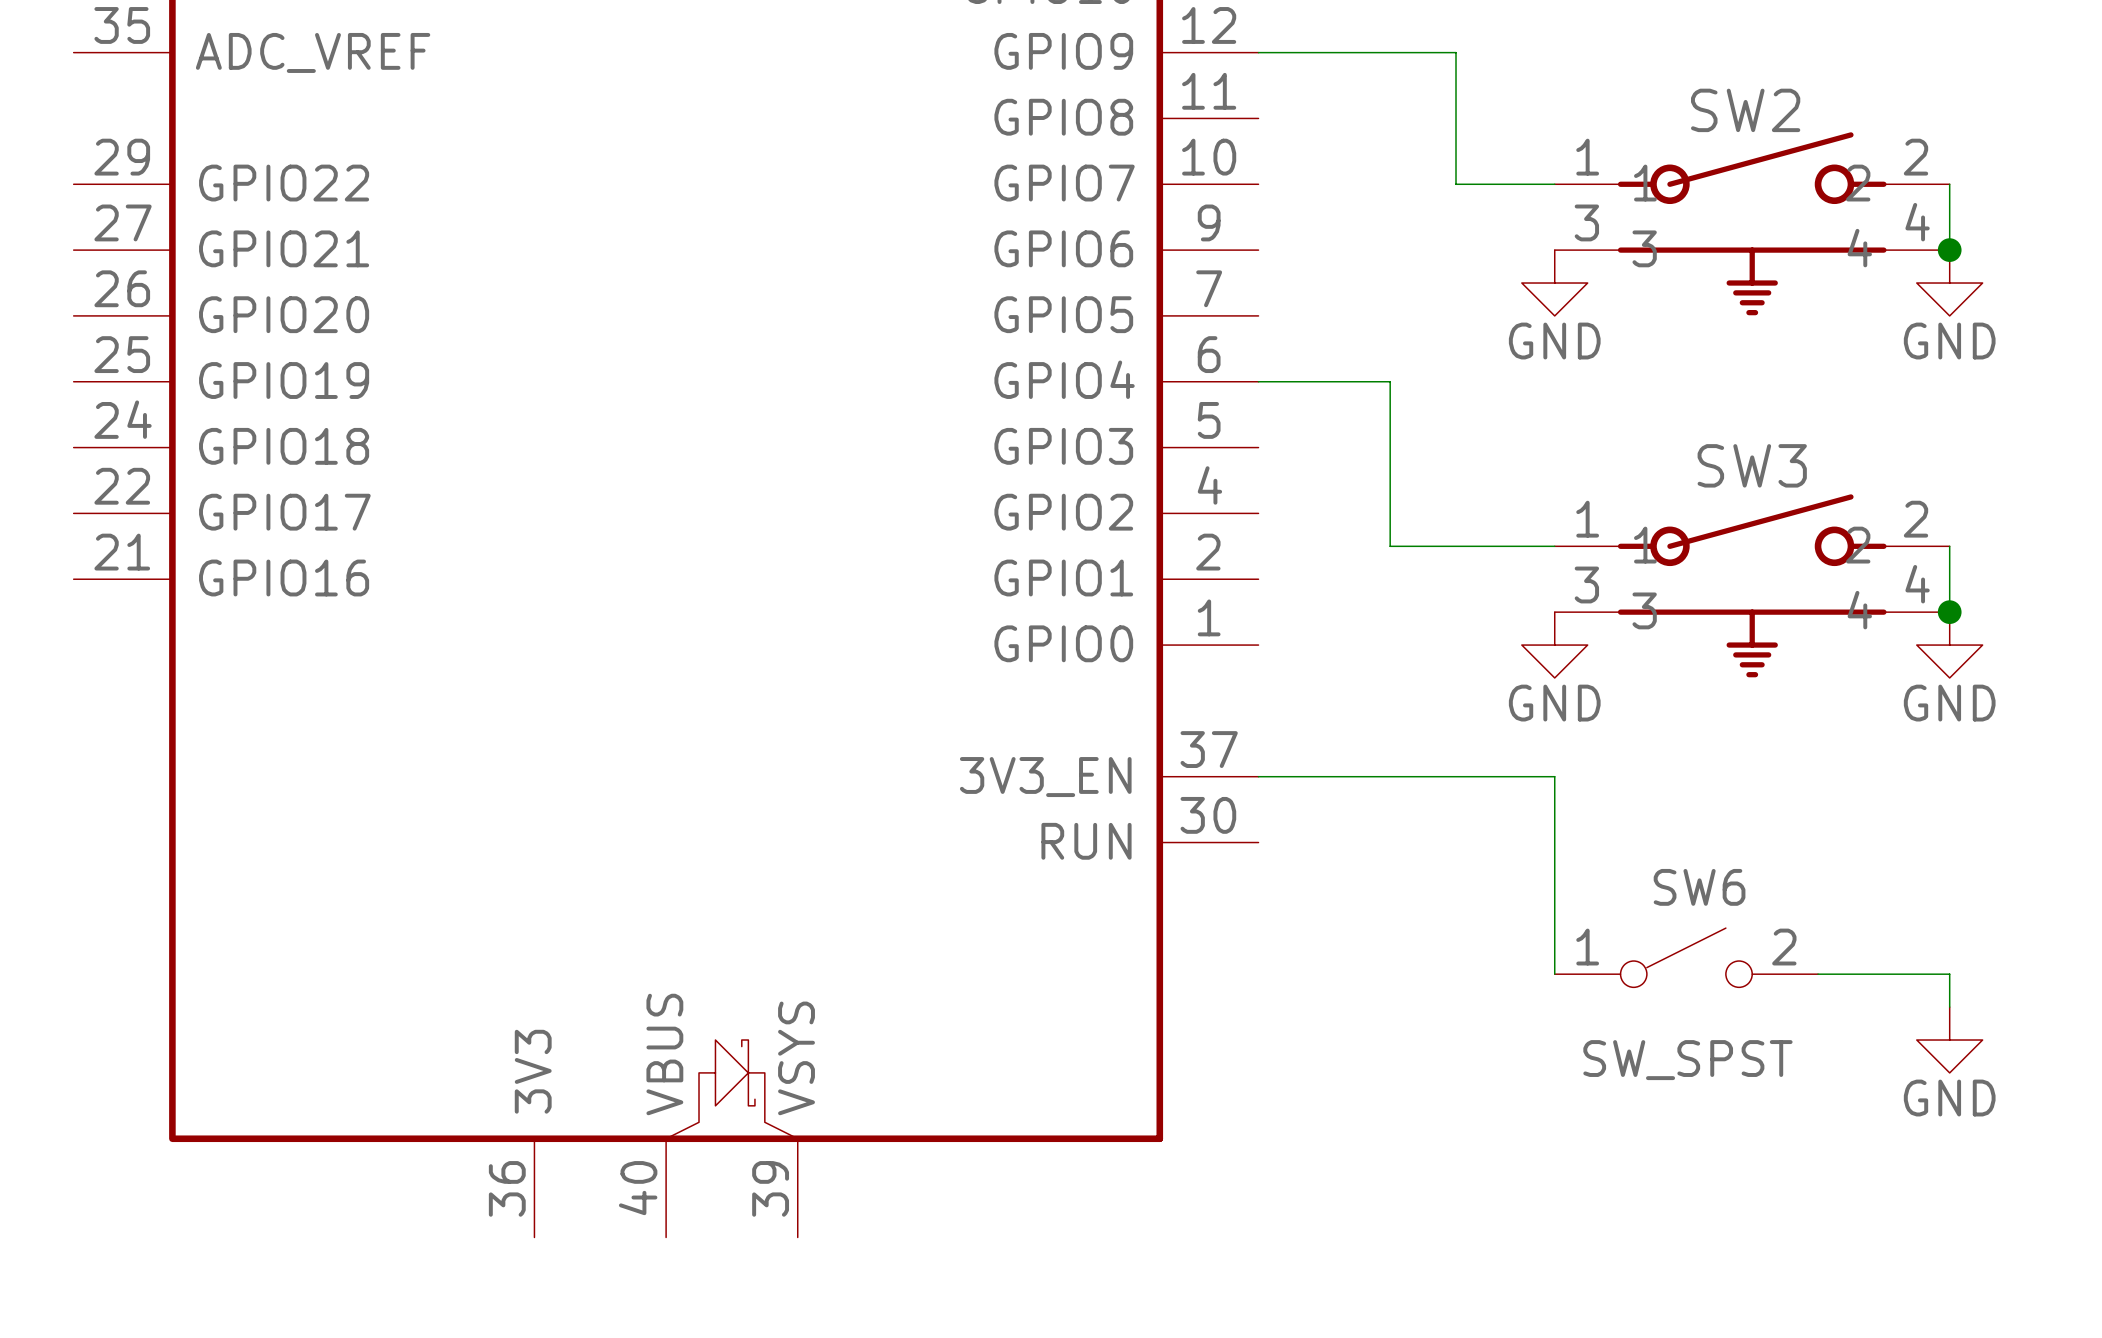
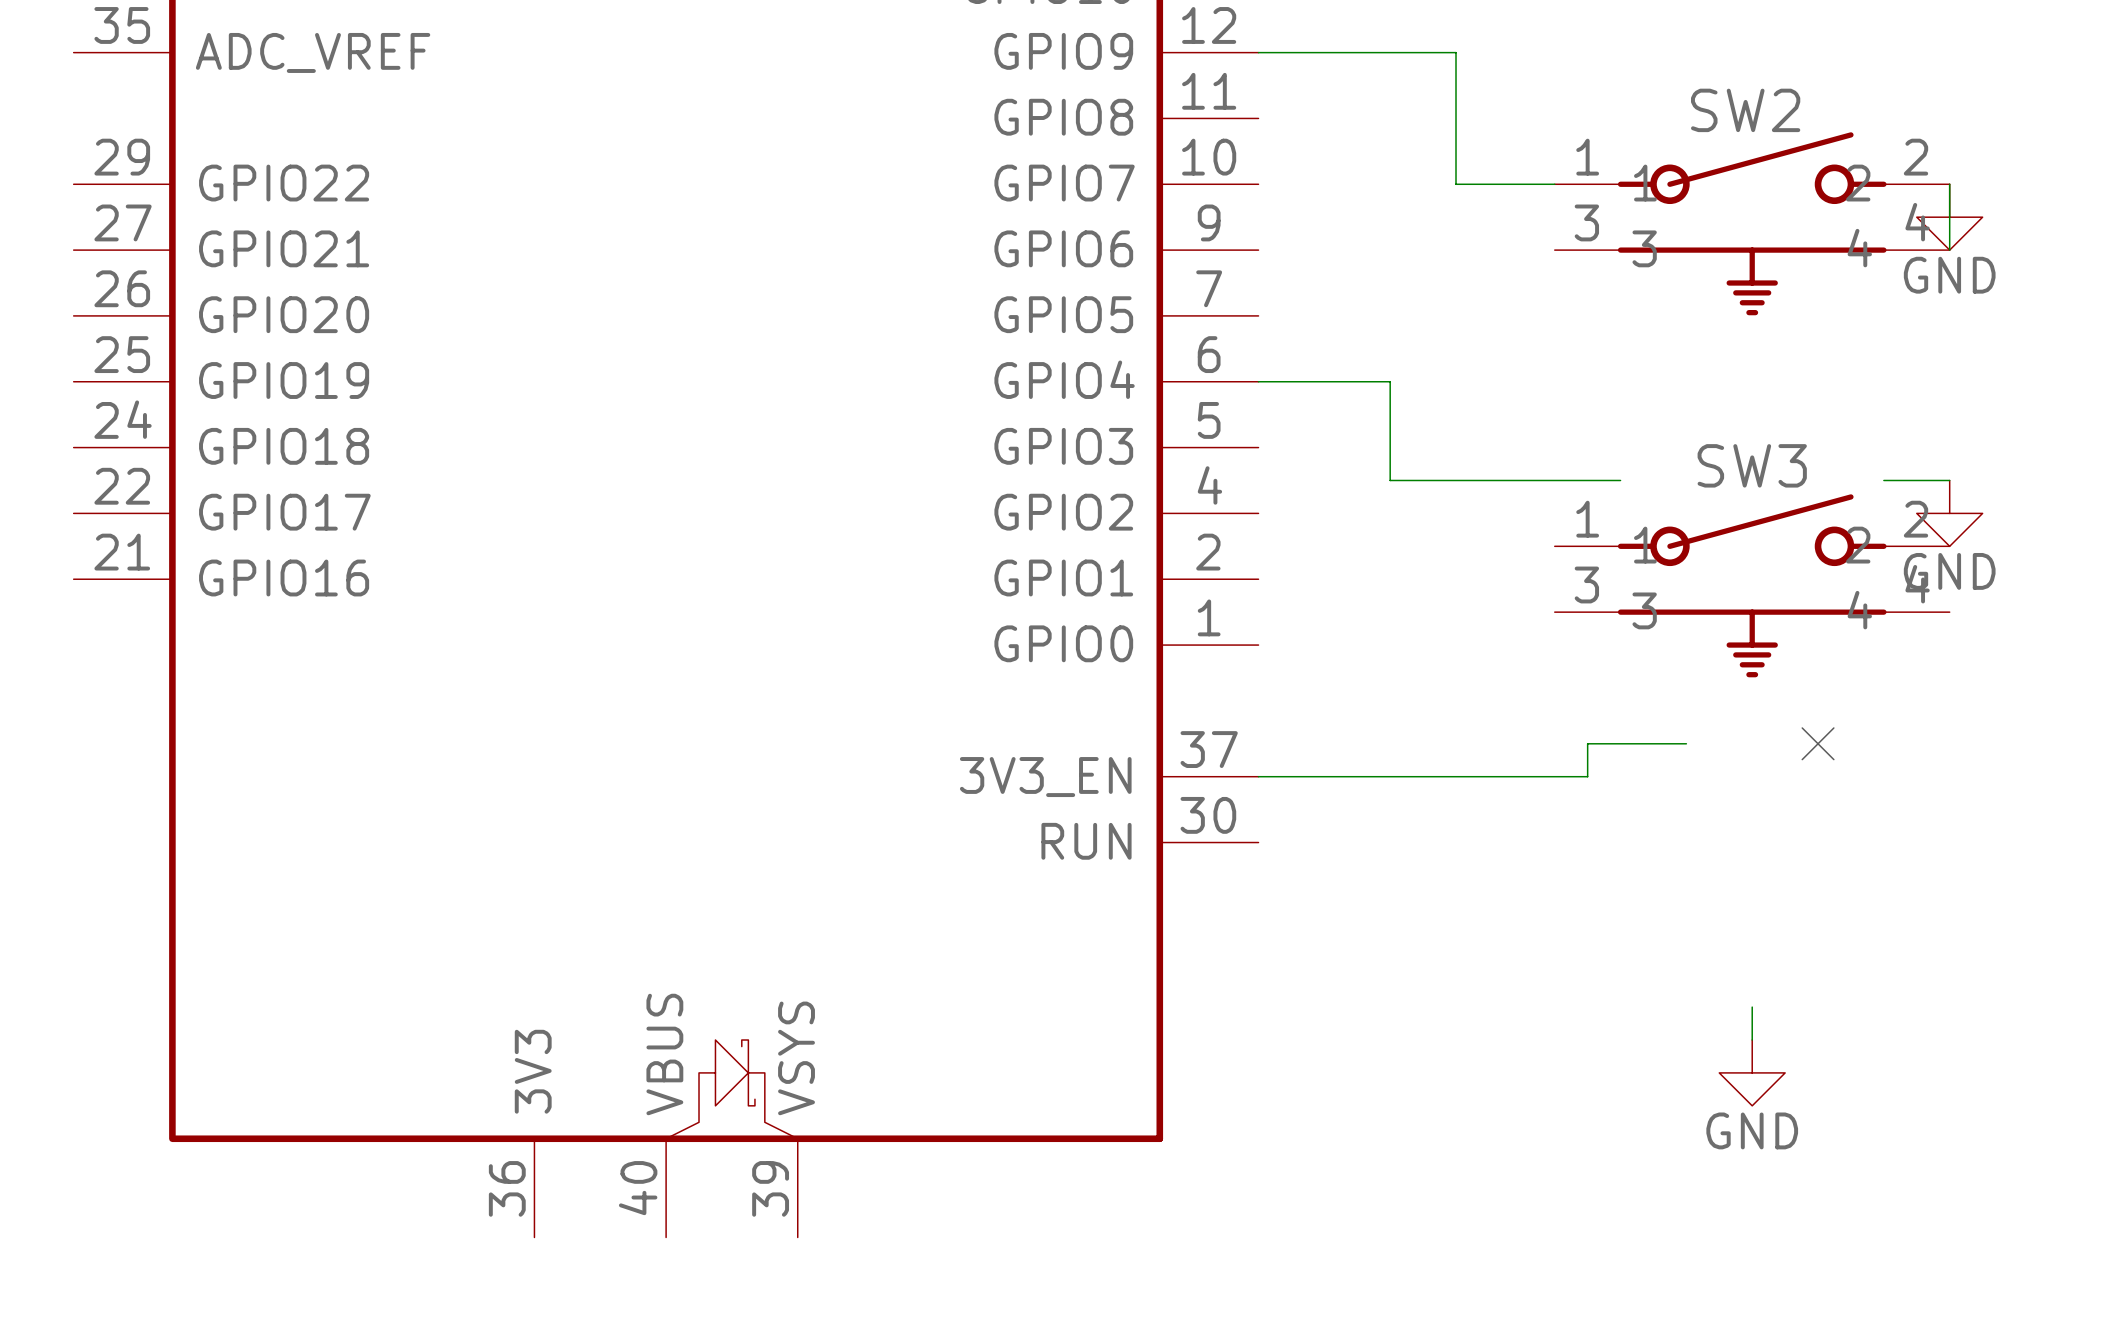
junction: (1949, 250) -> none
power symbol: GND (1554, 283) -> none
power symbol position: GND (1949, 283) -> GND (1949, 217)
wire: (1390, 480) (1390, 546) (1554, 546) -> (1390, 480) (1620, 480)
wire: none -> (1883, 480) (1949, 480)
power symbol: none -> GND (1949, 513)
wire: (1949, 546) (1949, 612) -> none
junction: (1949, 612) -> none
power symbol: GND (1554, 645) -> none
power symbol: GND (1949, 645) -> none
no-connect mark: none -> (1818, 743)
wire: (1554, 776) (1554, 974) -> (1554, 776) (1587, 776) (1587, 743) (1686, 743)
SW6: SW_SPST (1686, 957) -> none
wire: (1818, 974) (1949, 974) (1949, 1007) -> none
wire: none -> (1752, 1007) (1752, 1040)
power symbol position: GND (1949, 1040) -> GND (1752, 1072)

